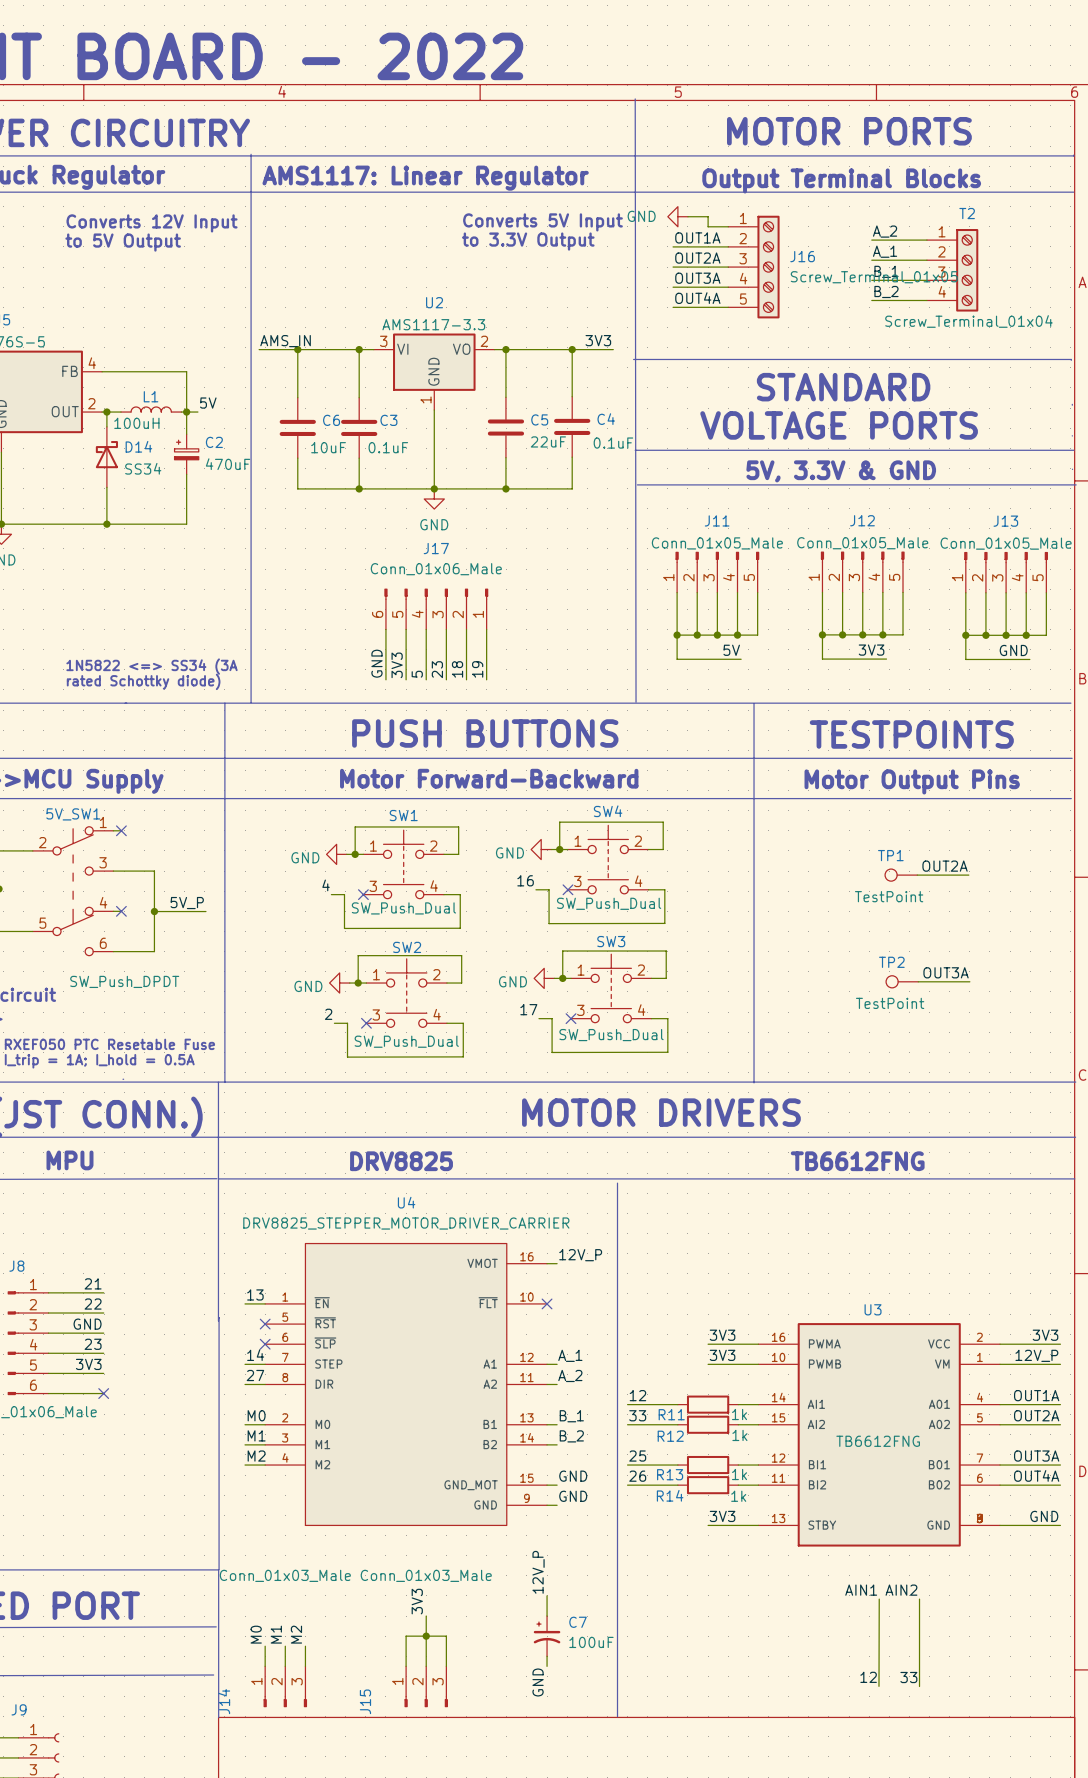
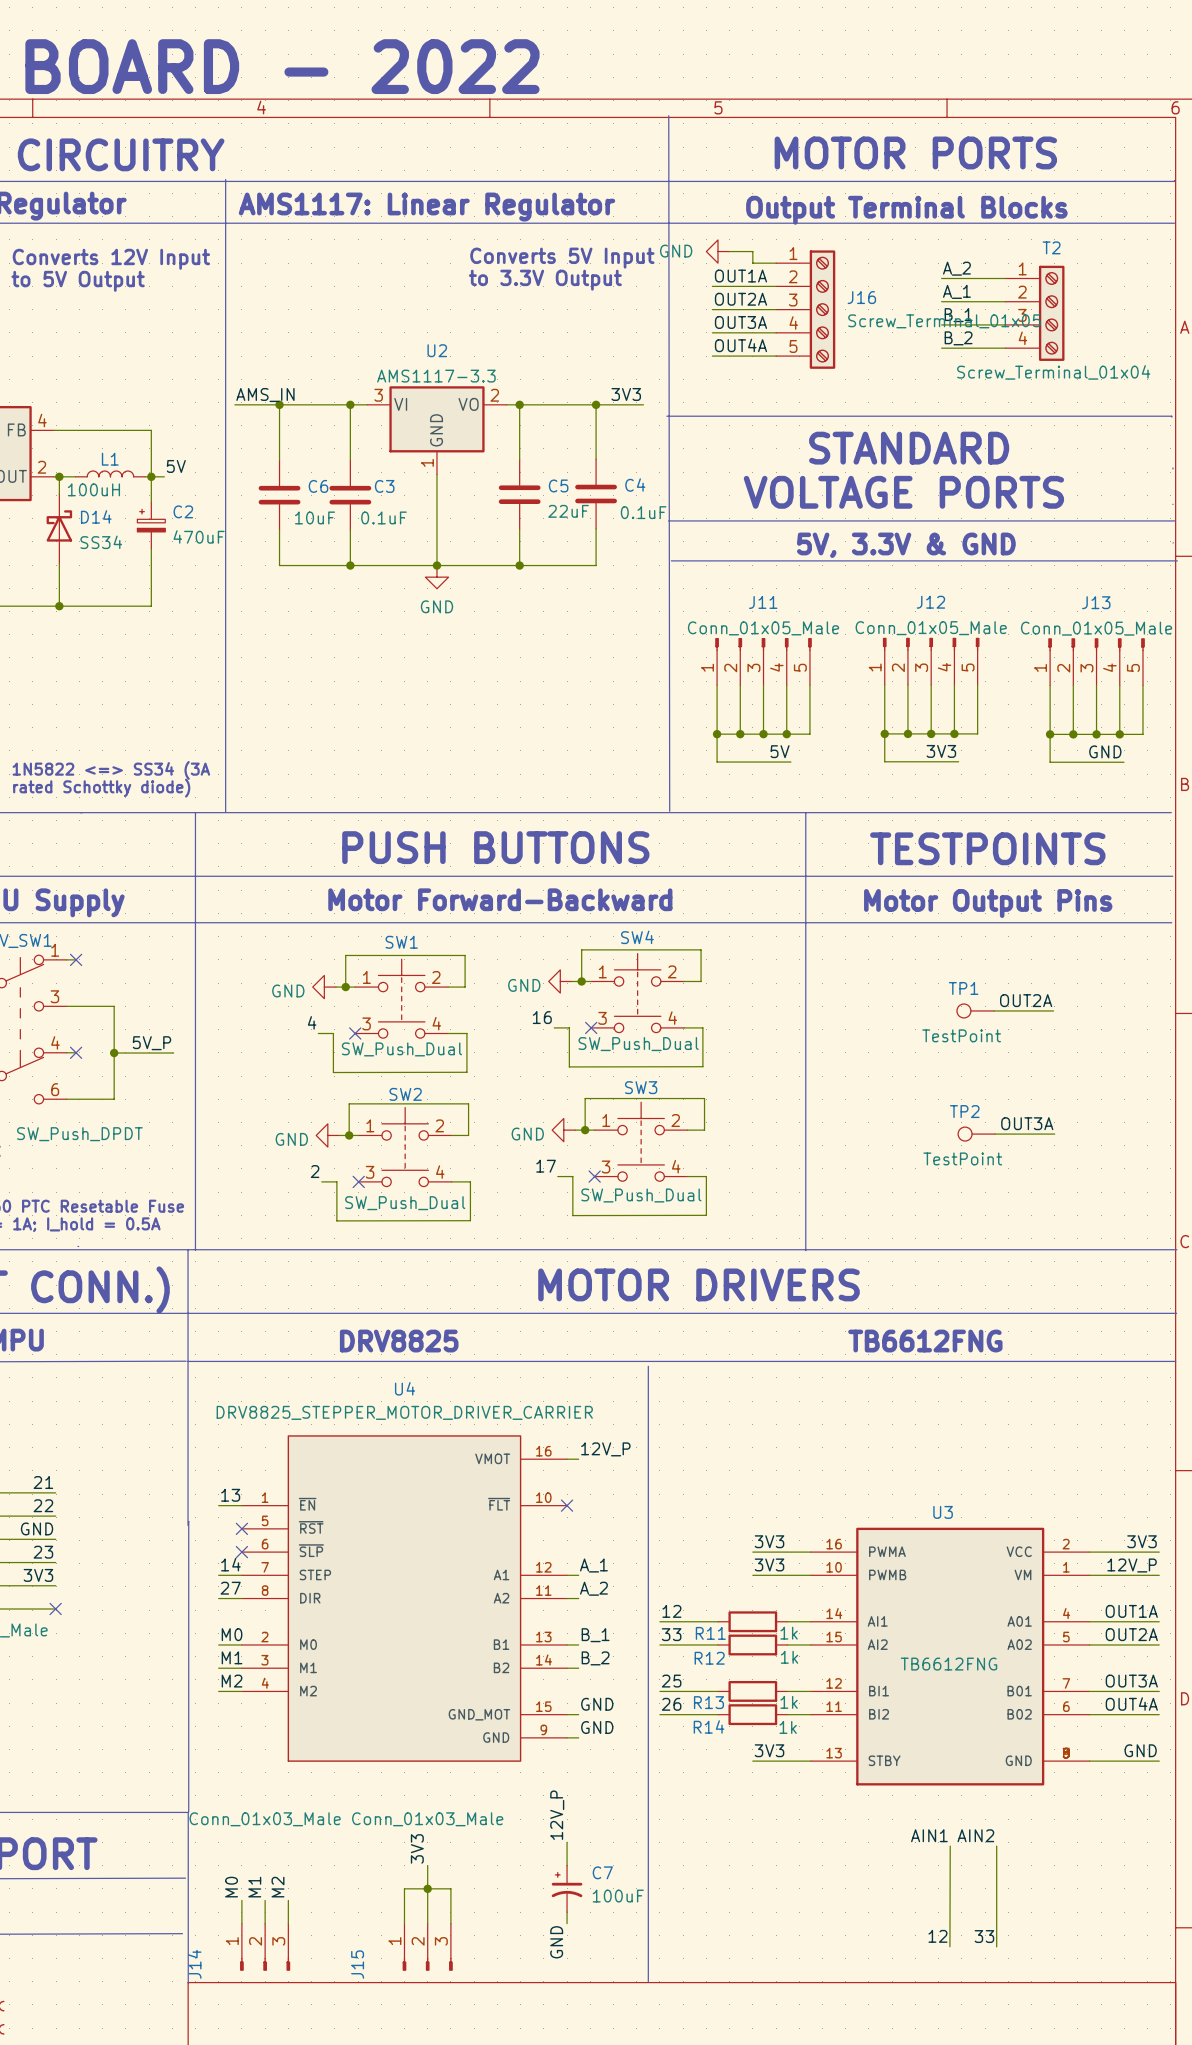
J17: Conn_01x06_Male (436, 609) -> none
wire: (385, 629) (385, 679) -> none
wire: (406, 629) (406, 679) -> none
wire: (426, 629) (426, 679) -> none
wire: (446, 629) (446, 679) -> none
wire: (466, 629) (466, 679) -> none
wire: (486, 629) (486, 679) -> none
label: GND (376, 663) -> none
label: 3V3 (397, 665) -> none
label: 23 (437, 669) -> none
label: 18 (457, 669) -> none
label: 19 (477, 669) -> none
label: 5 (417, 674) -> none

